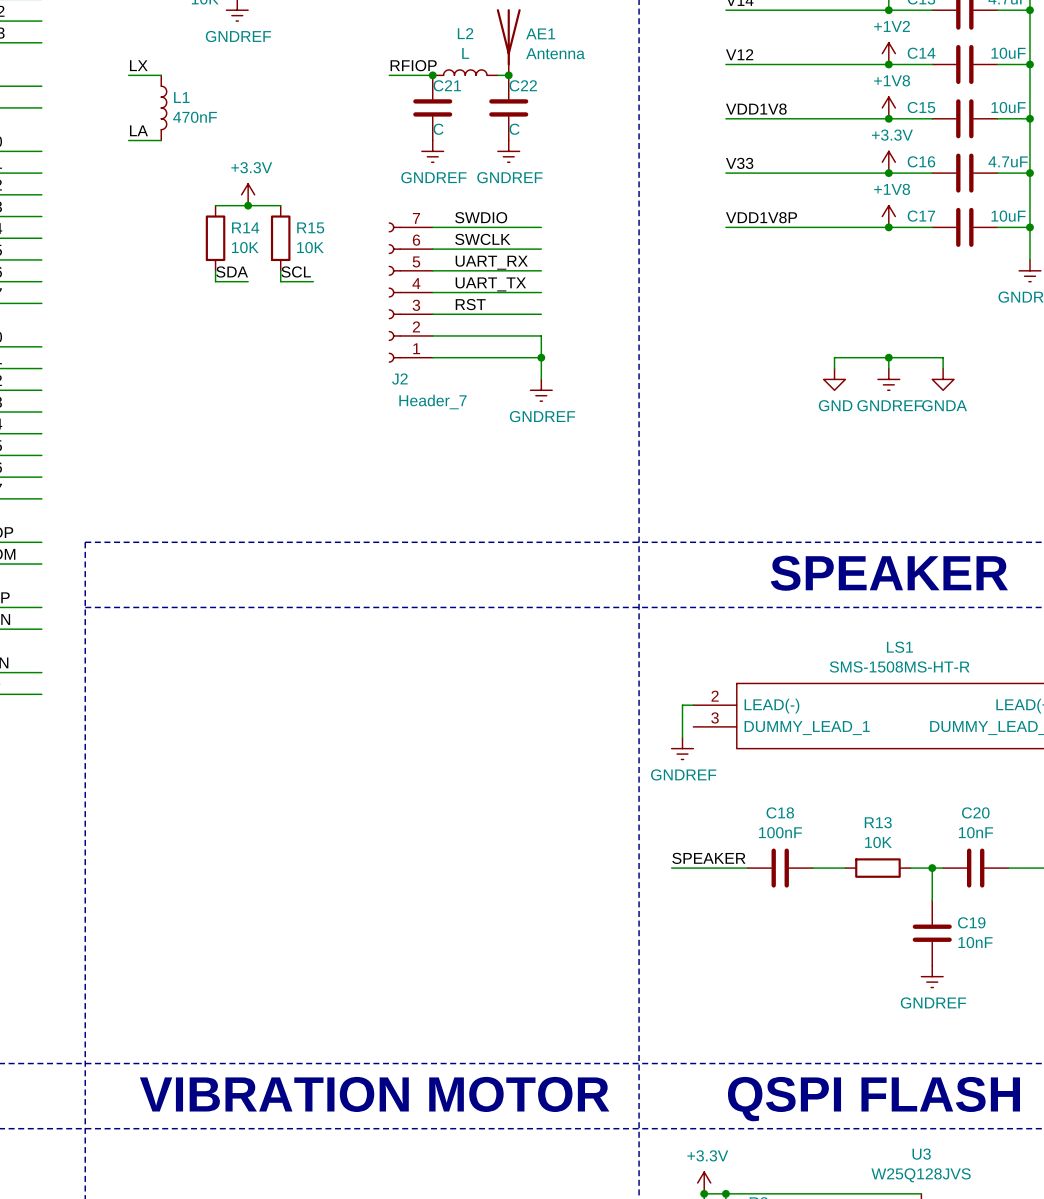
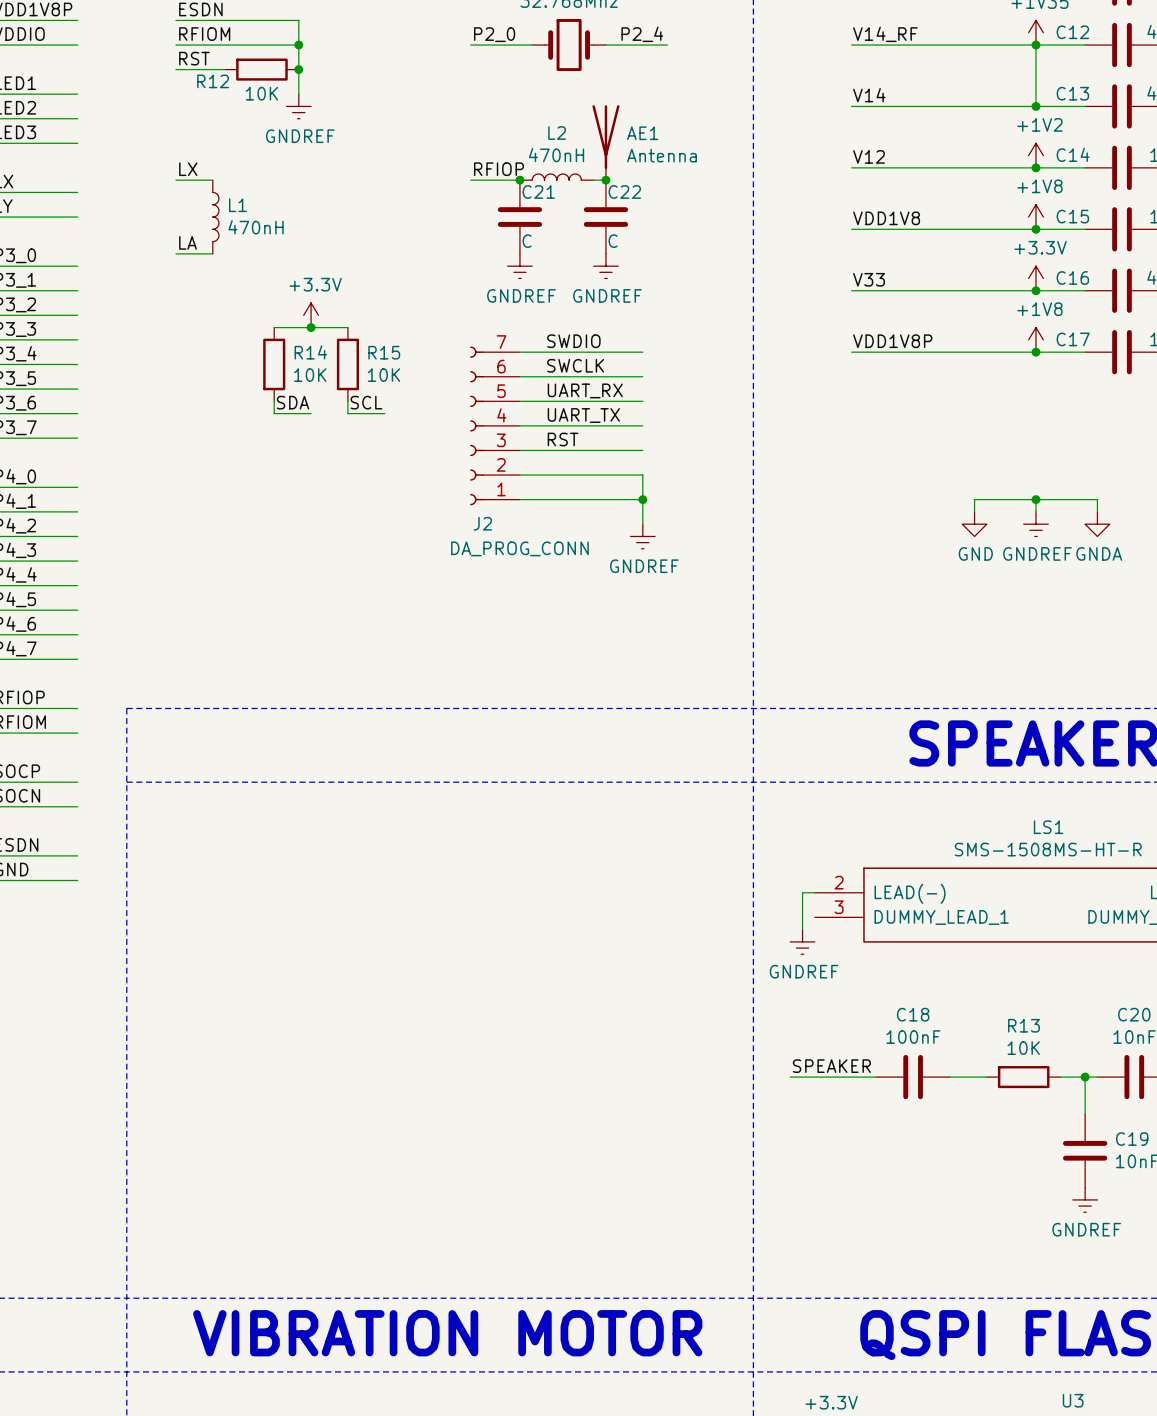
L2 value: L (465, 53) -> 470nH (556, 155)
L1 value: 470nF (195, 117) -> 470nH (256, 227)
J2 value: Header_7 (432, 402) -> DA_PROG_CONN (519, 548)

